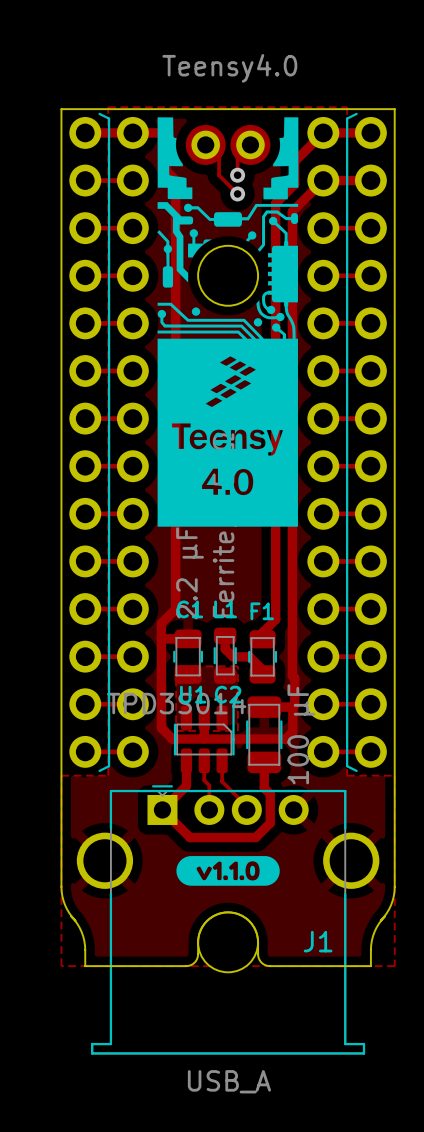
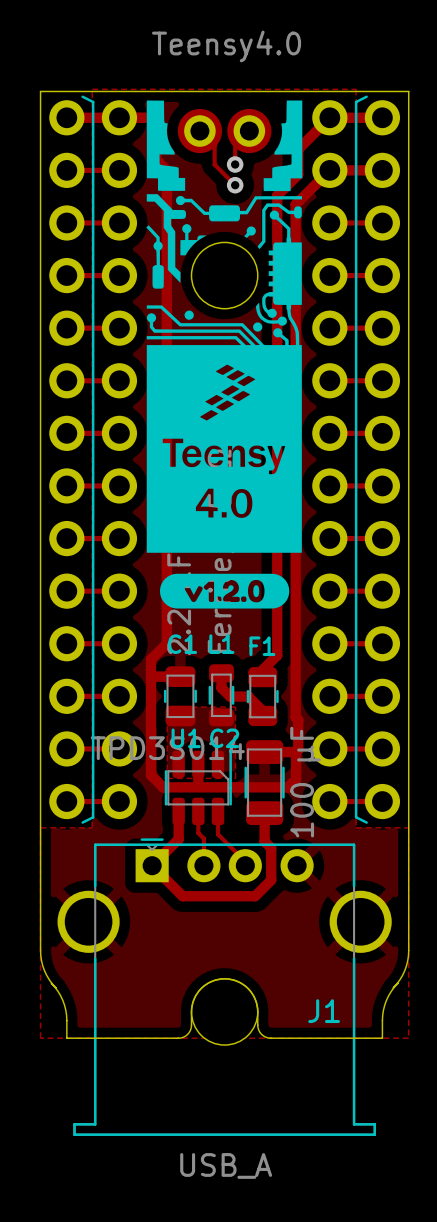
drawing: none -> [159, 573, 290, 609]
drawing: [176, 856, 280, 886] -> none

